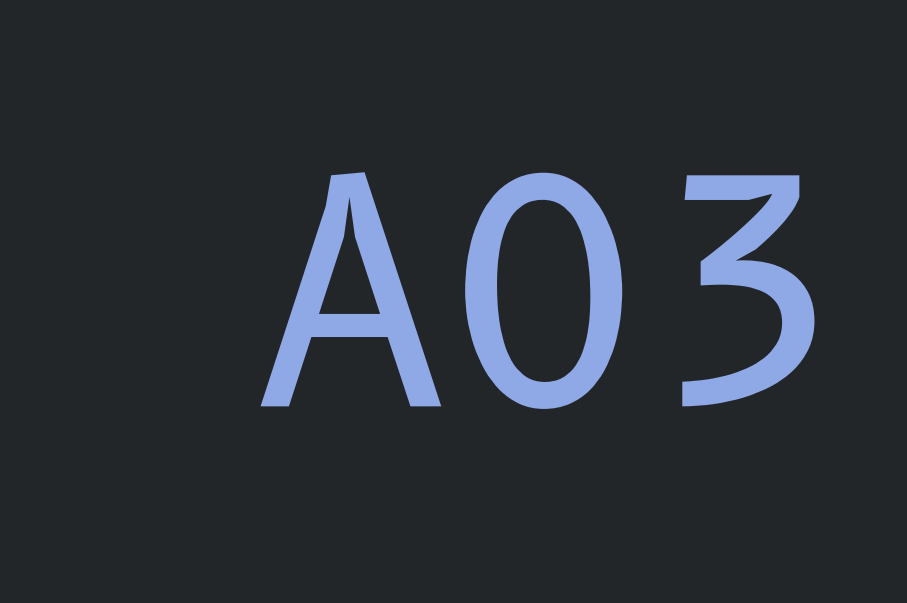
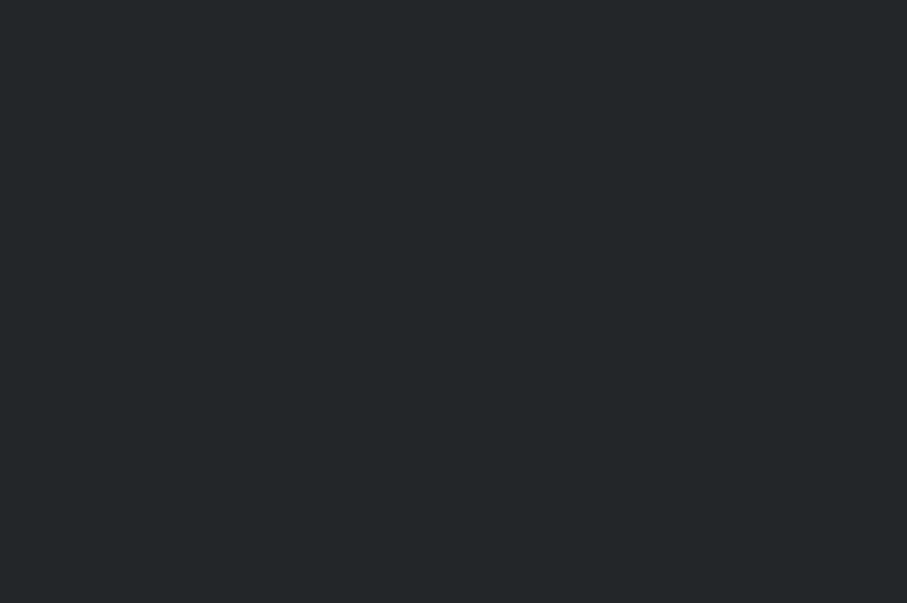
text: A03 (537, 290) -> none

